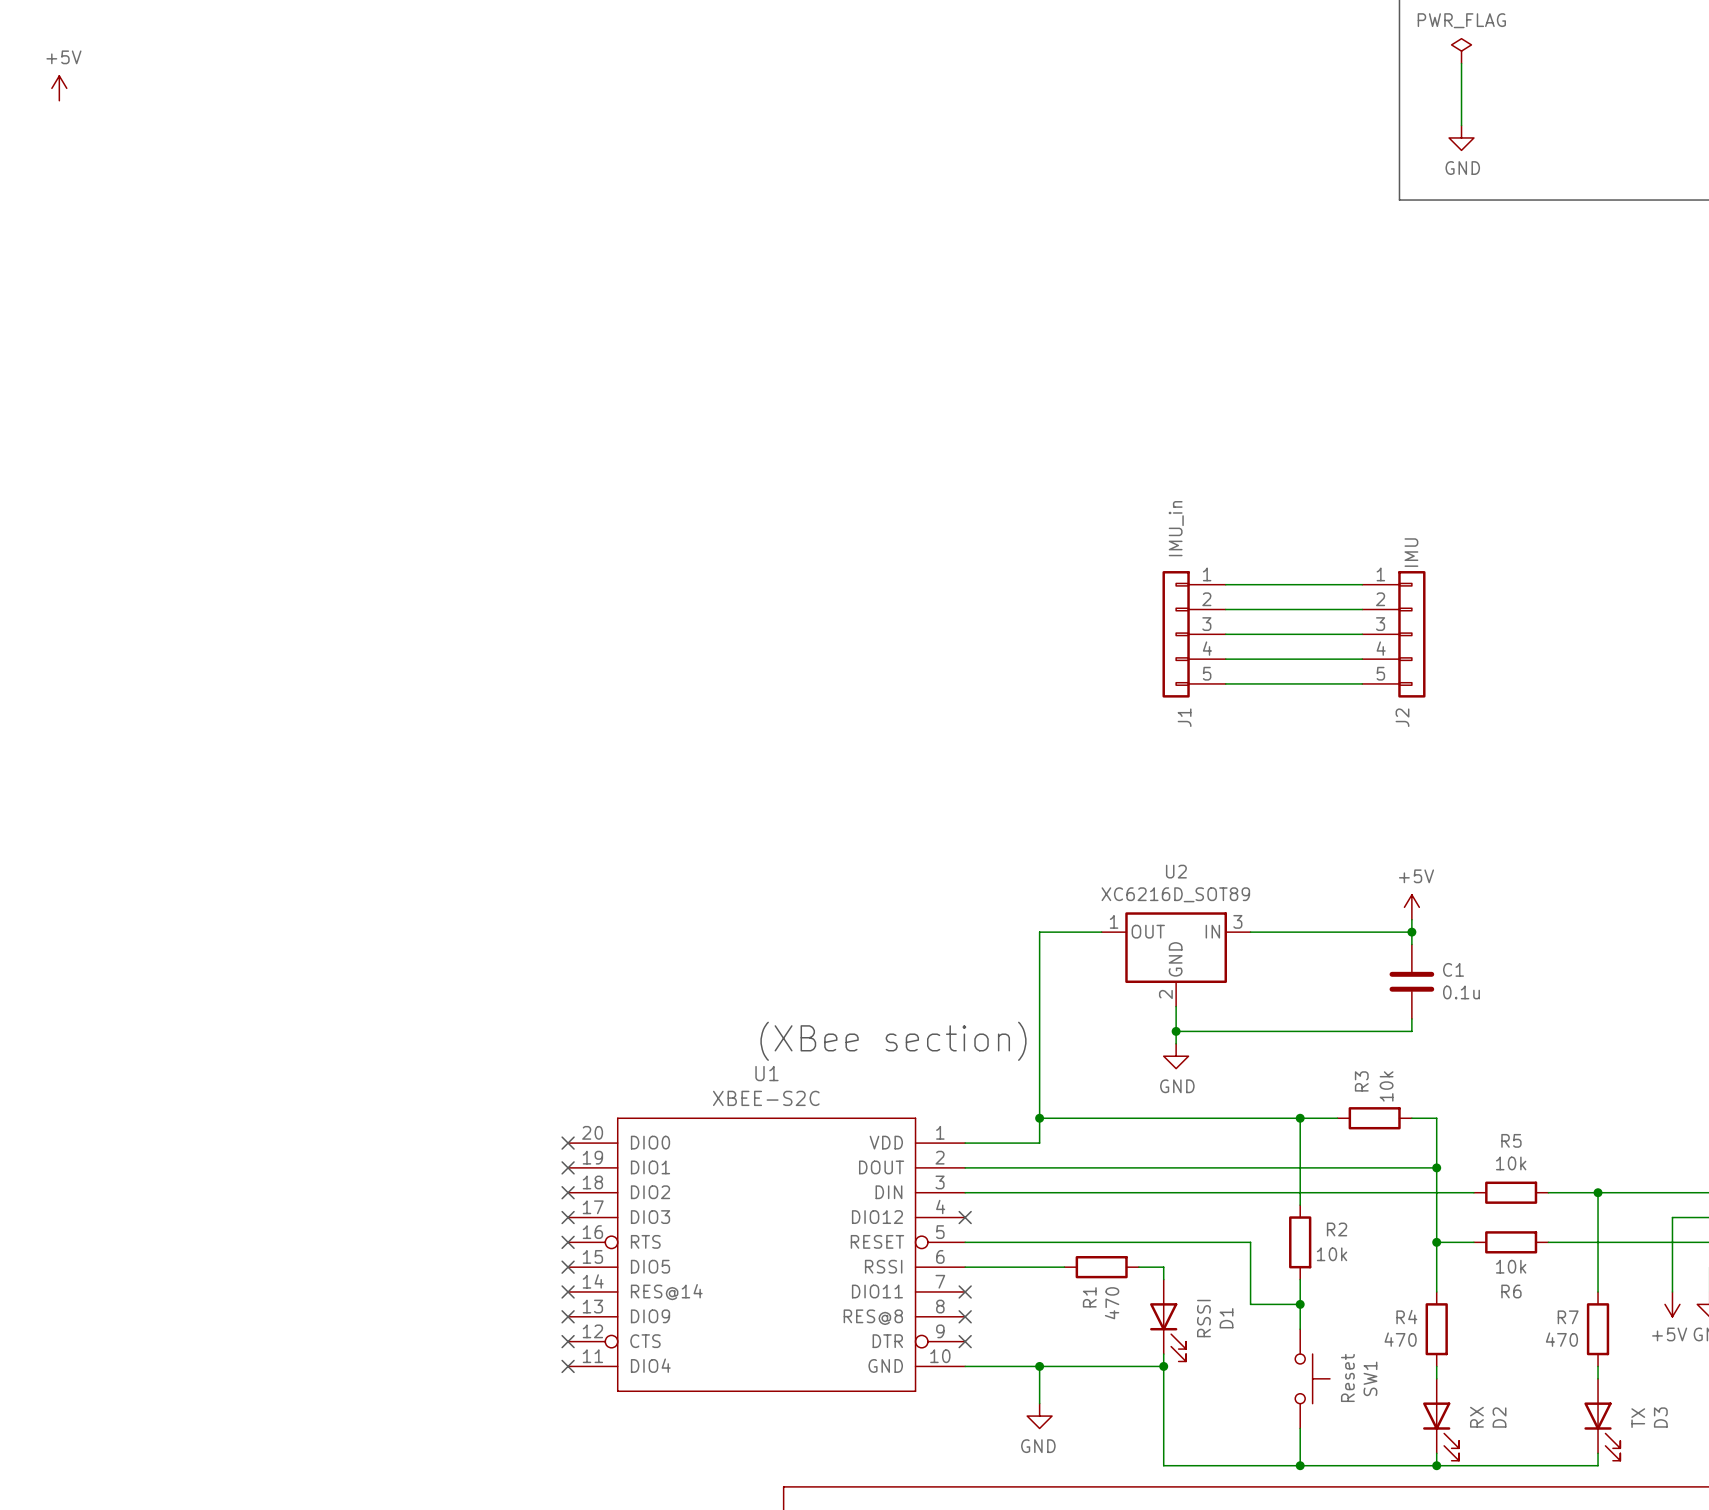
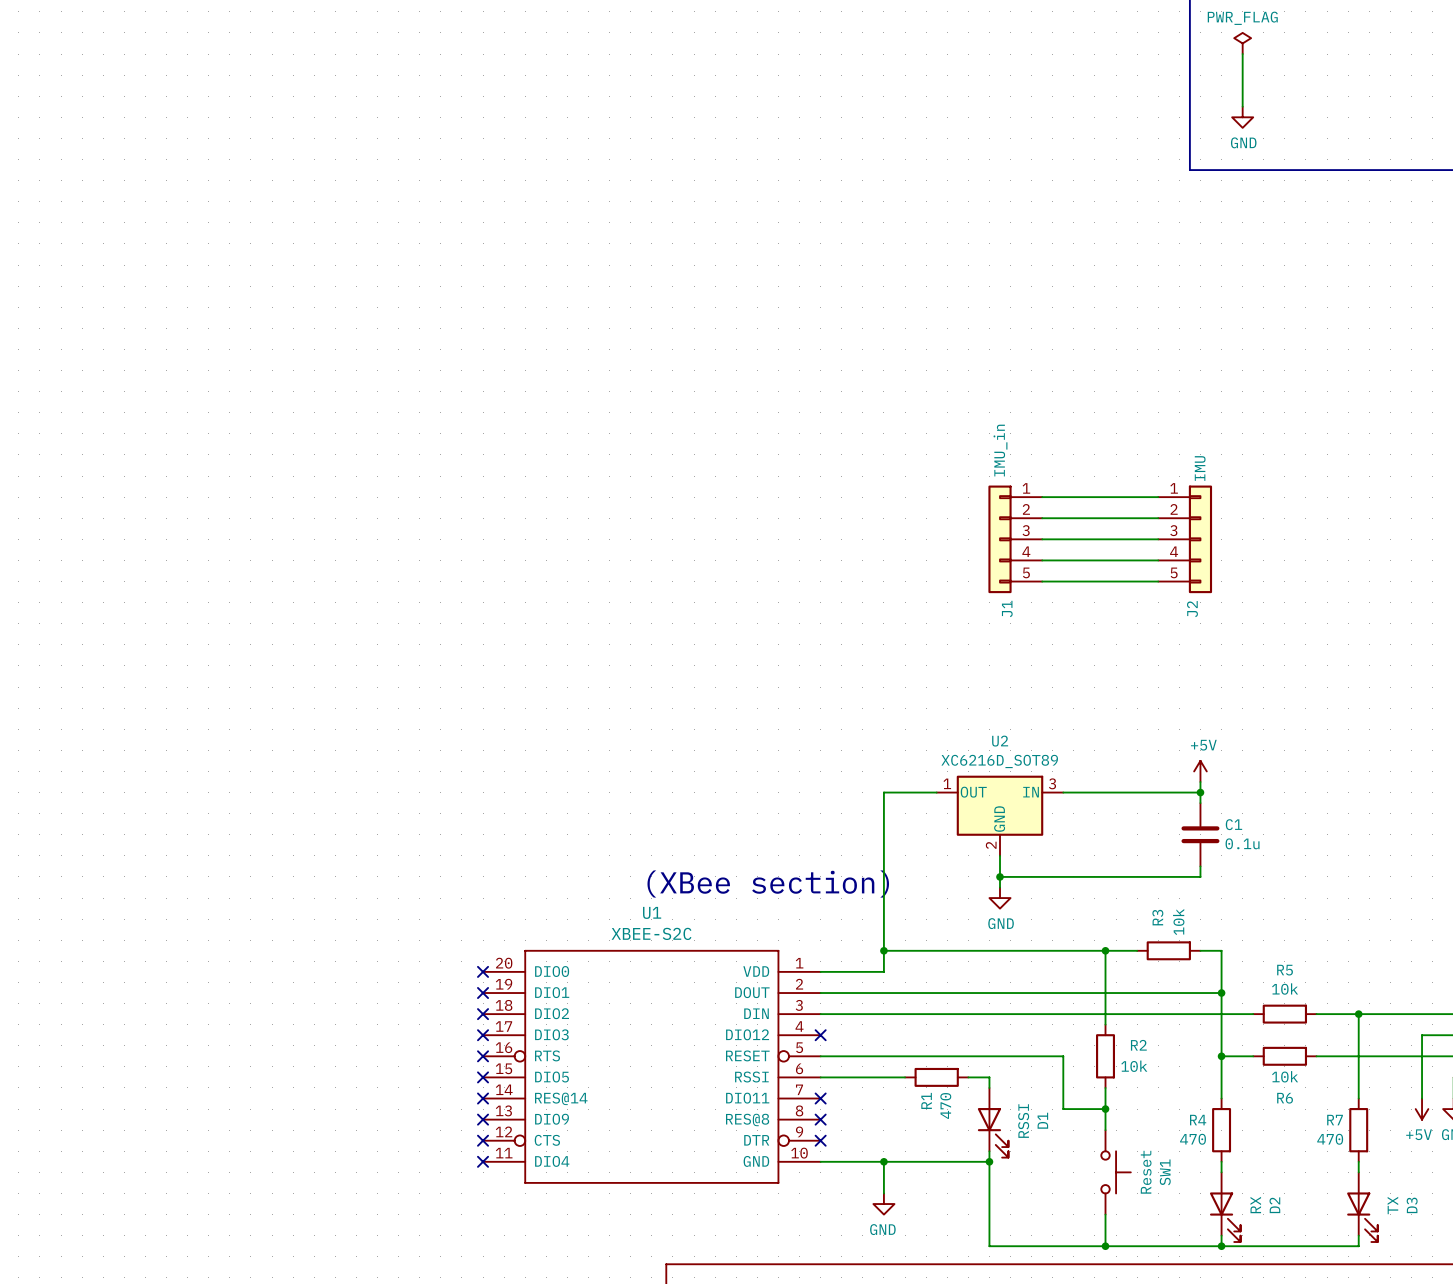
power symbol: +5V (59, 88) -> none

